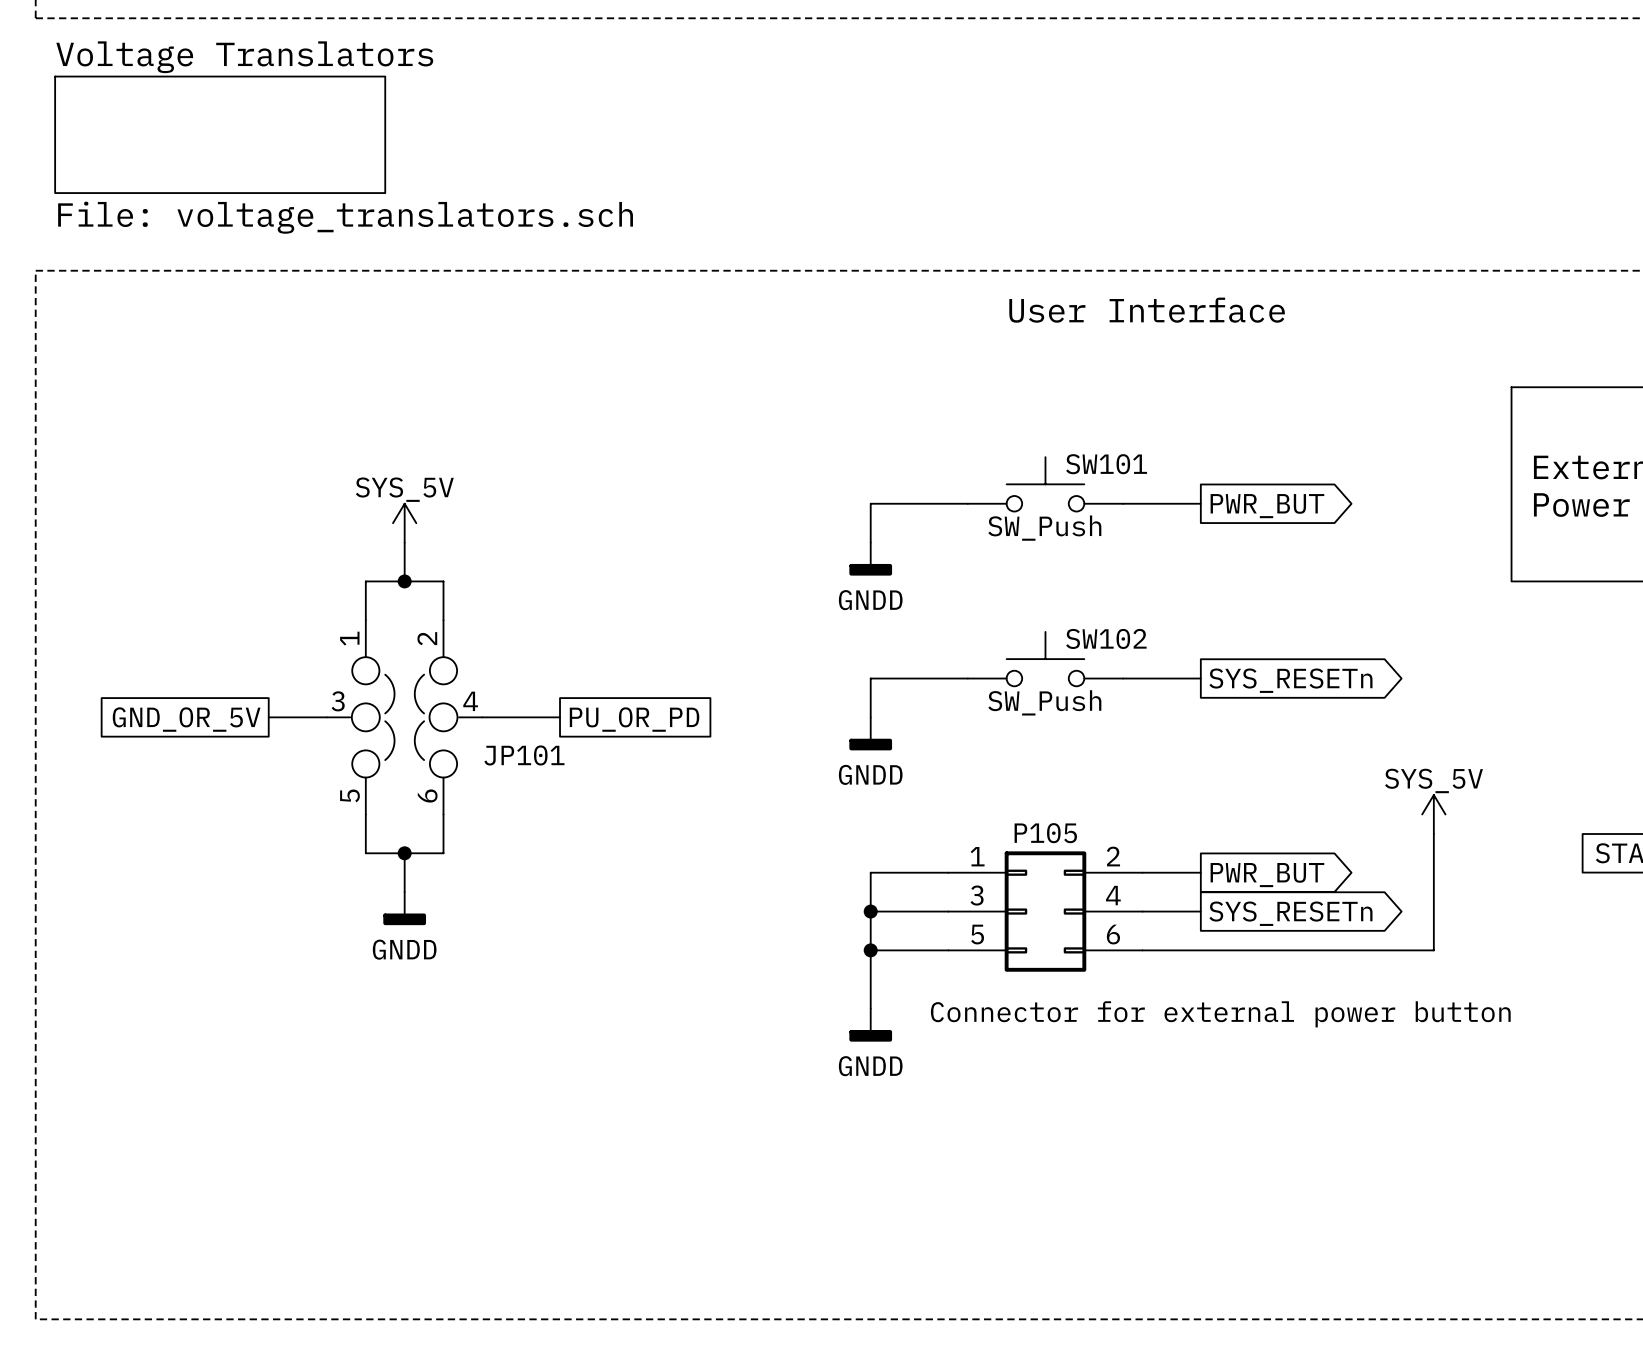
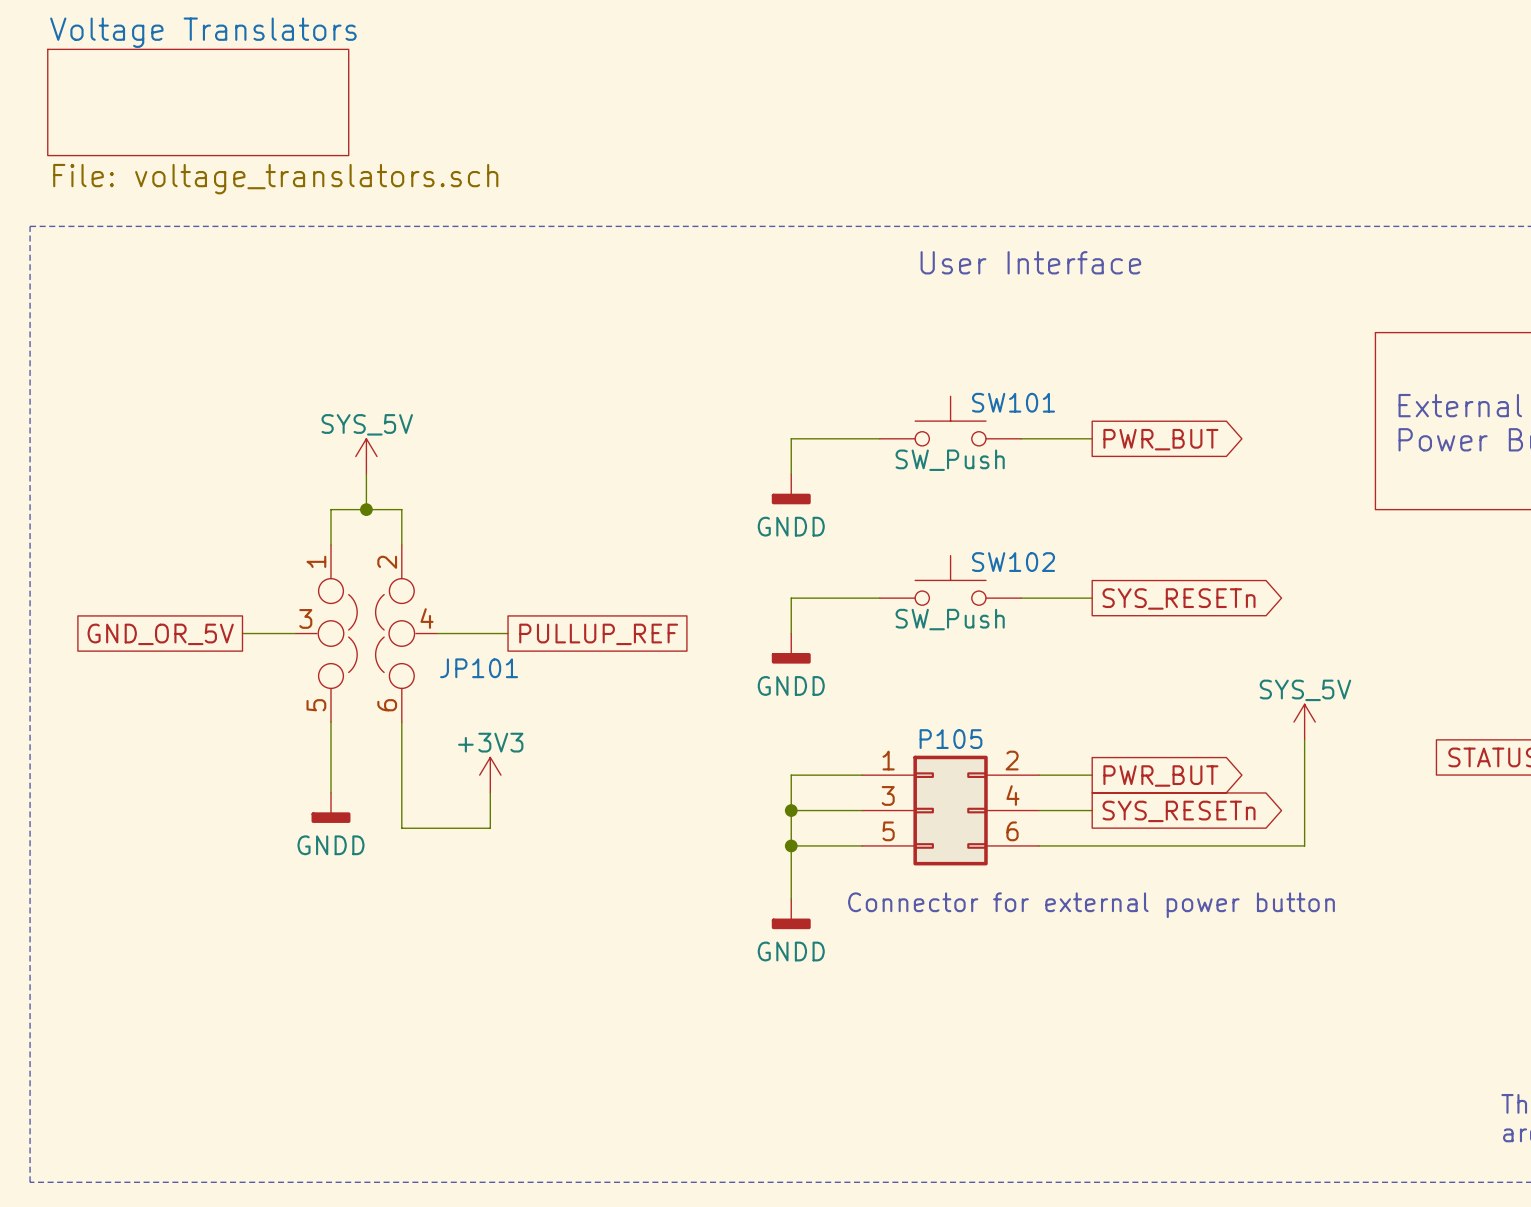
global label: PU_OR_PD (634, 719) -> PULLUP_REF (598, 634)
wire: (365, 853) (443, 853) -> (331, 757) (331, 792)
wire: (404, 853) (404, 892) -> none
junction: (404, 853) -> none
wire: none -> (401, 757) (401, 828) (490, 828) (490, 792)
power symbol: none -> +3V3 (490, 775)
power symbol position: GNDD (404, 908) -> GNDD (331, 807)

